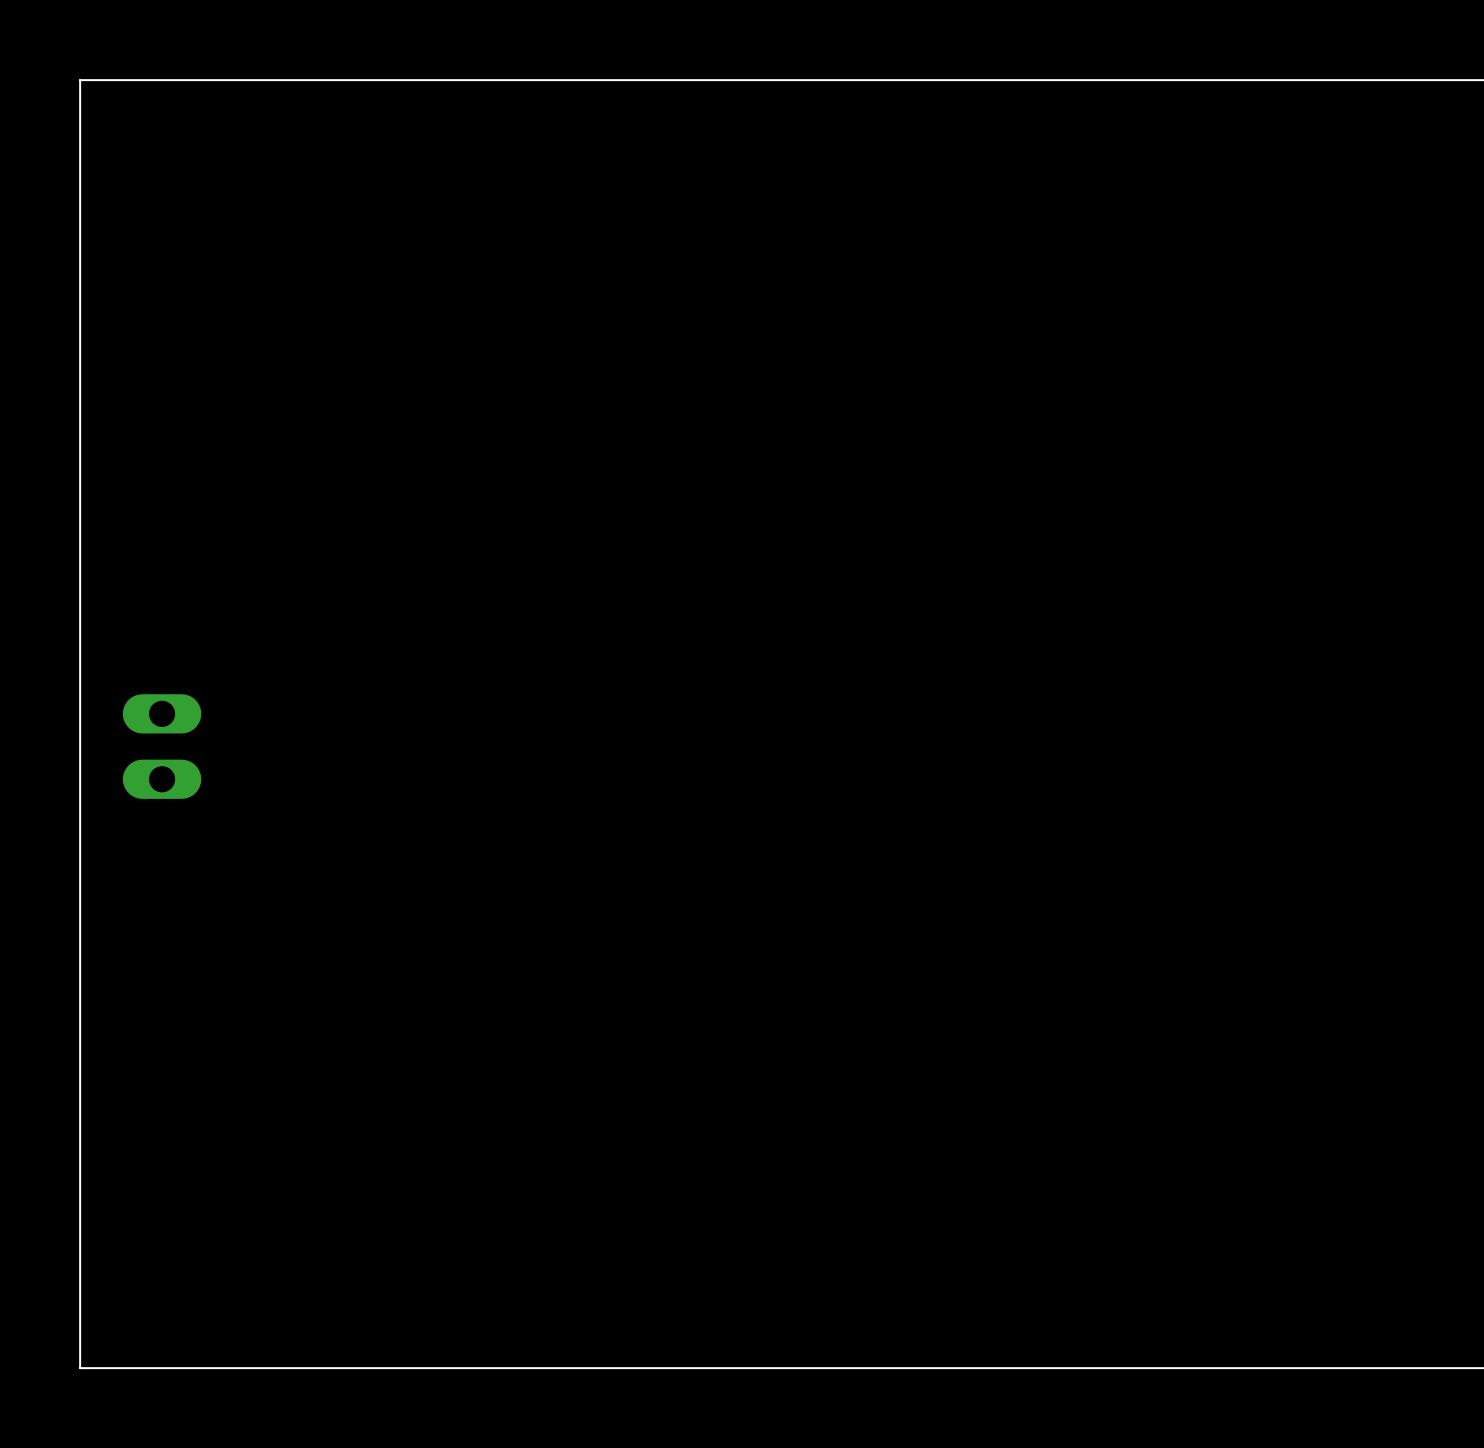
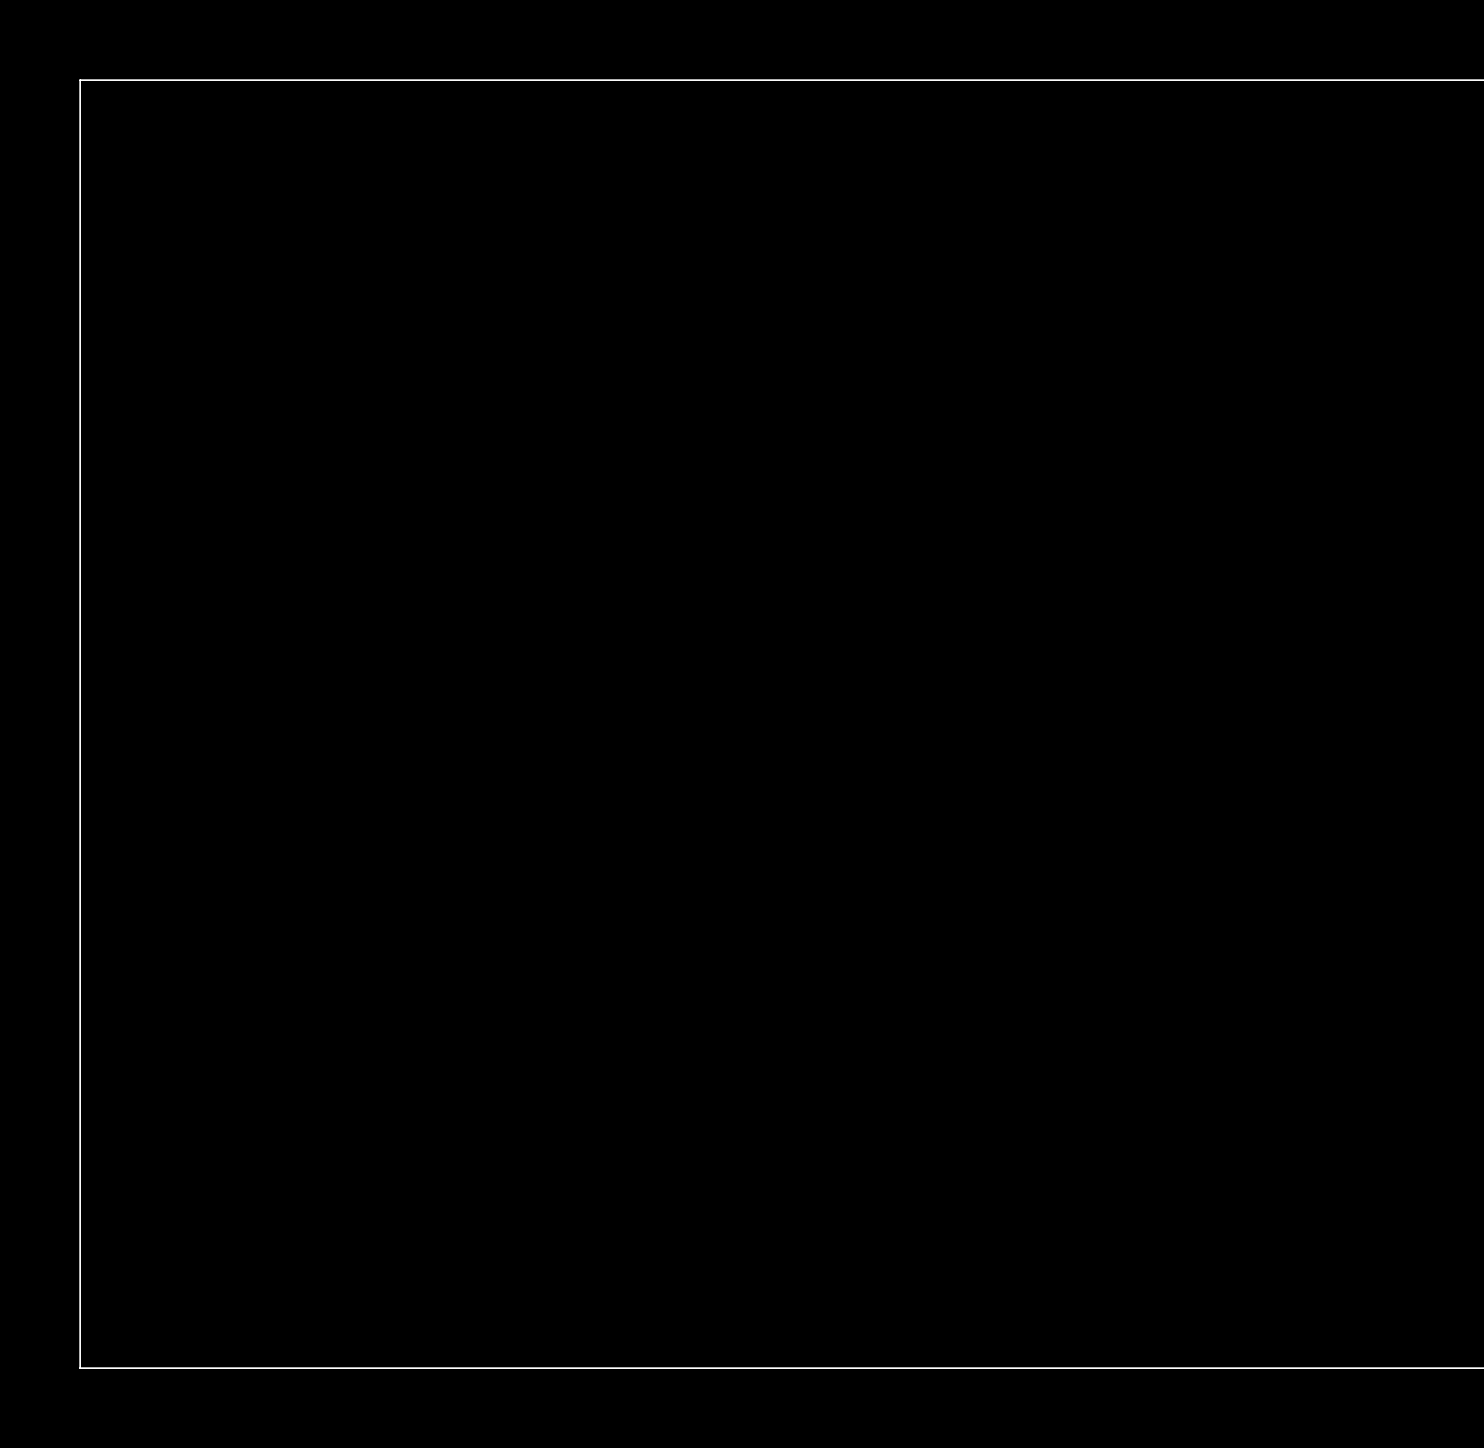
part: (162, 746) -> none

